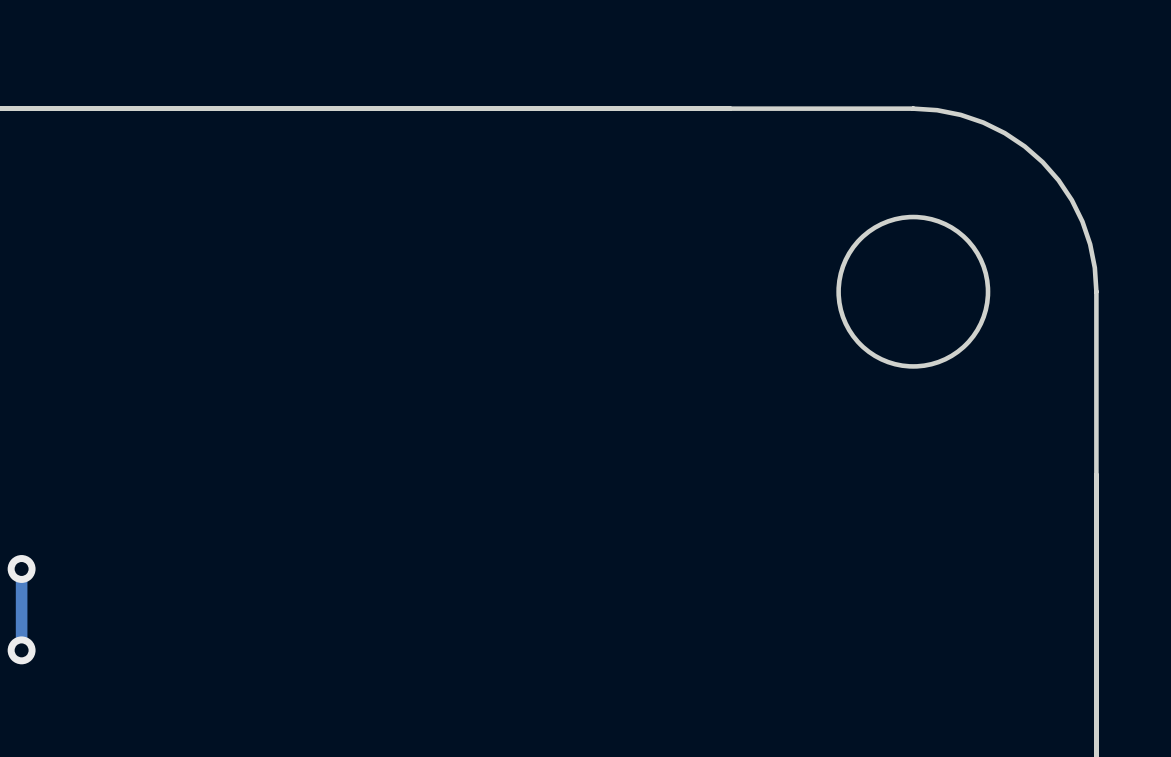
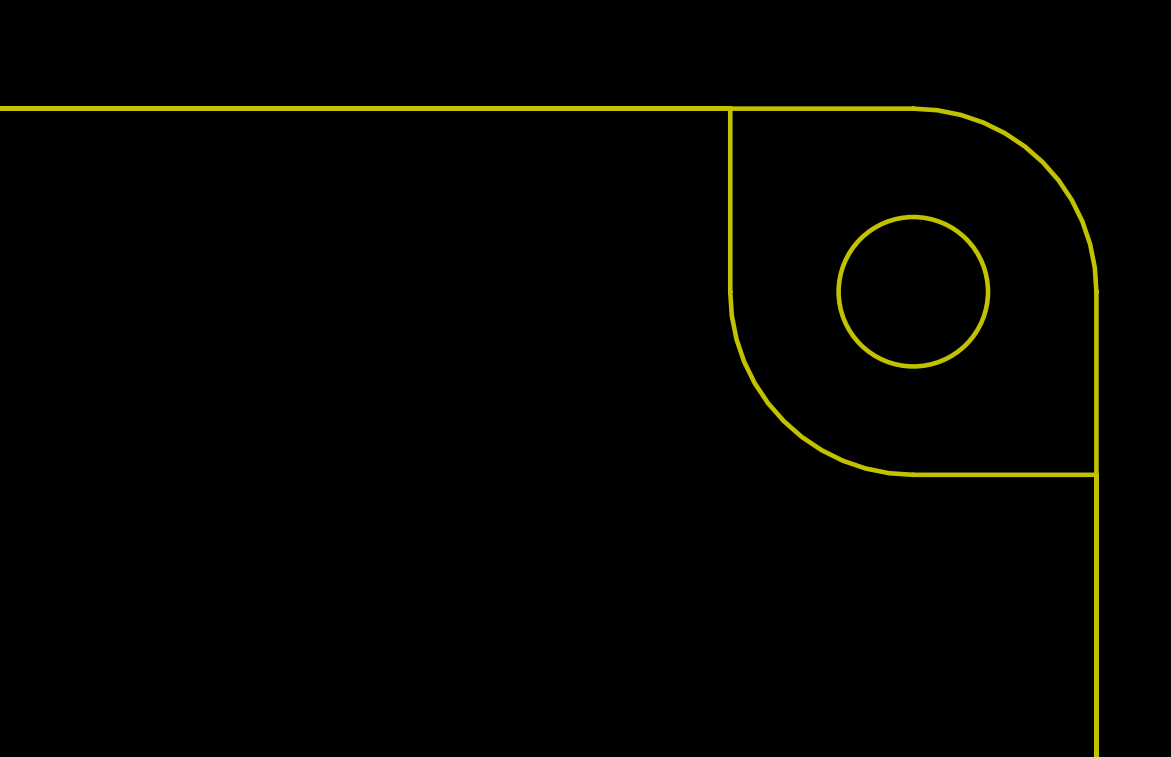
board edge: none -> (730, 108) (731, 315) (736, 339) (744, 361) (754, 383) (768, 403) (783, 421) (801, 436) (821, 450) (843, 460) (865, 468) (889, 473) (1096, 474)
track: (21, 568) (21, 650) -> none
via: (21, 568) -> none
via: (21, 650) -> none

